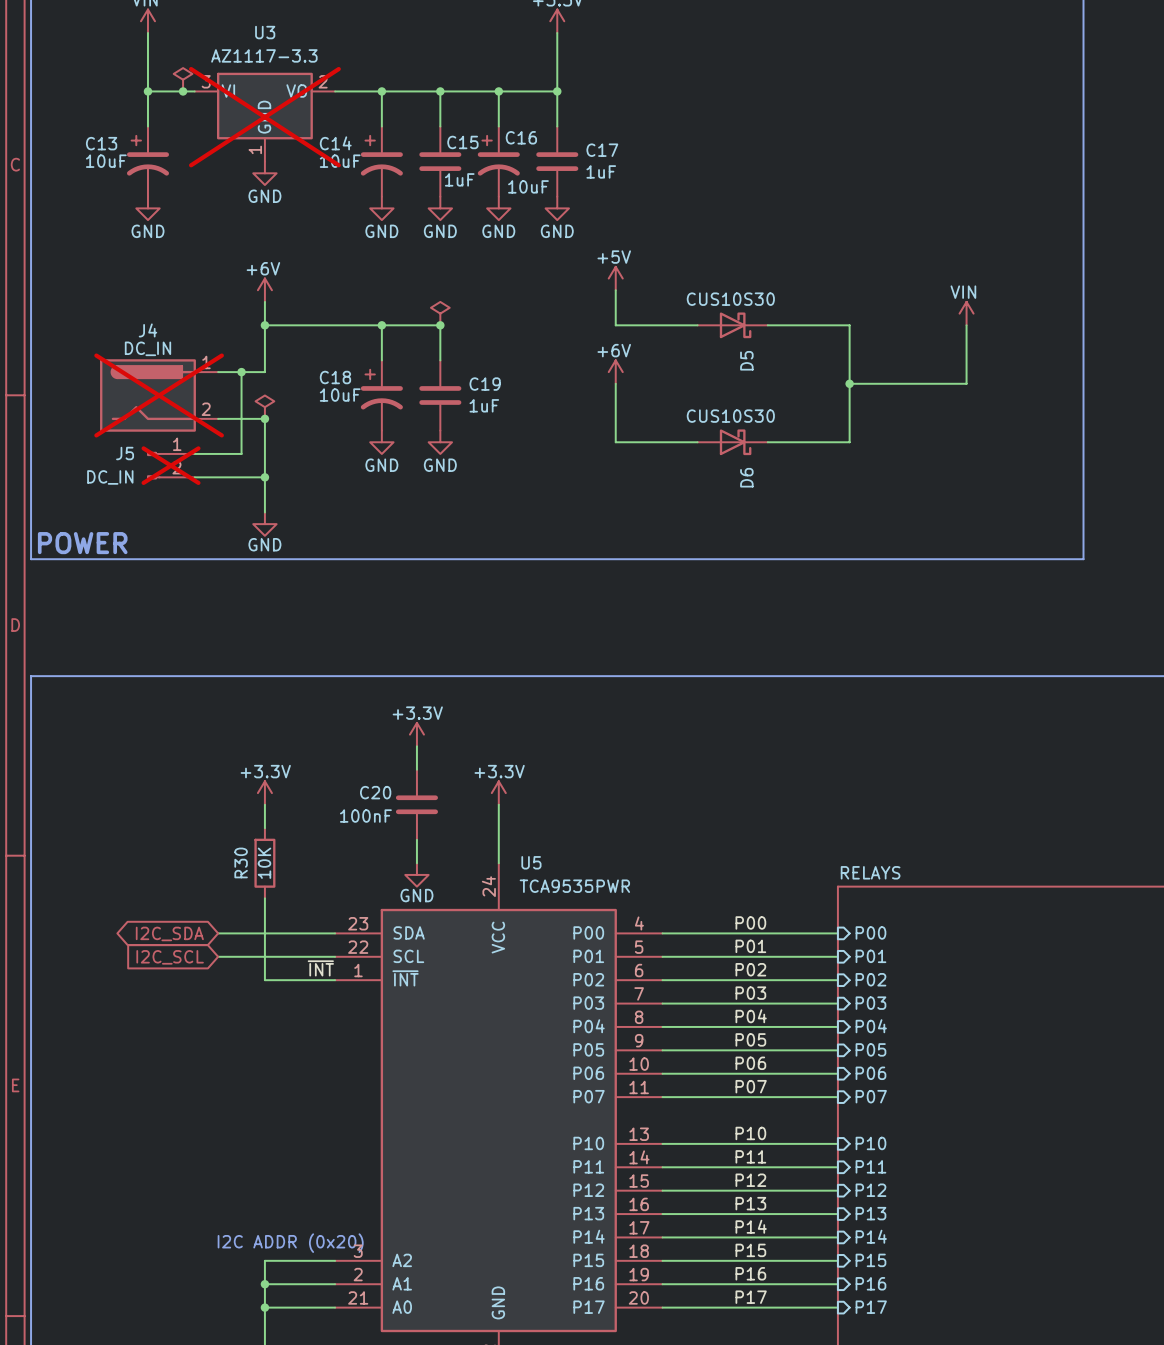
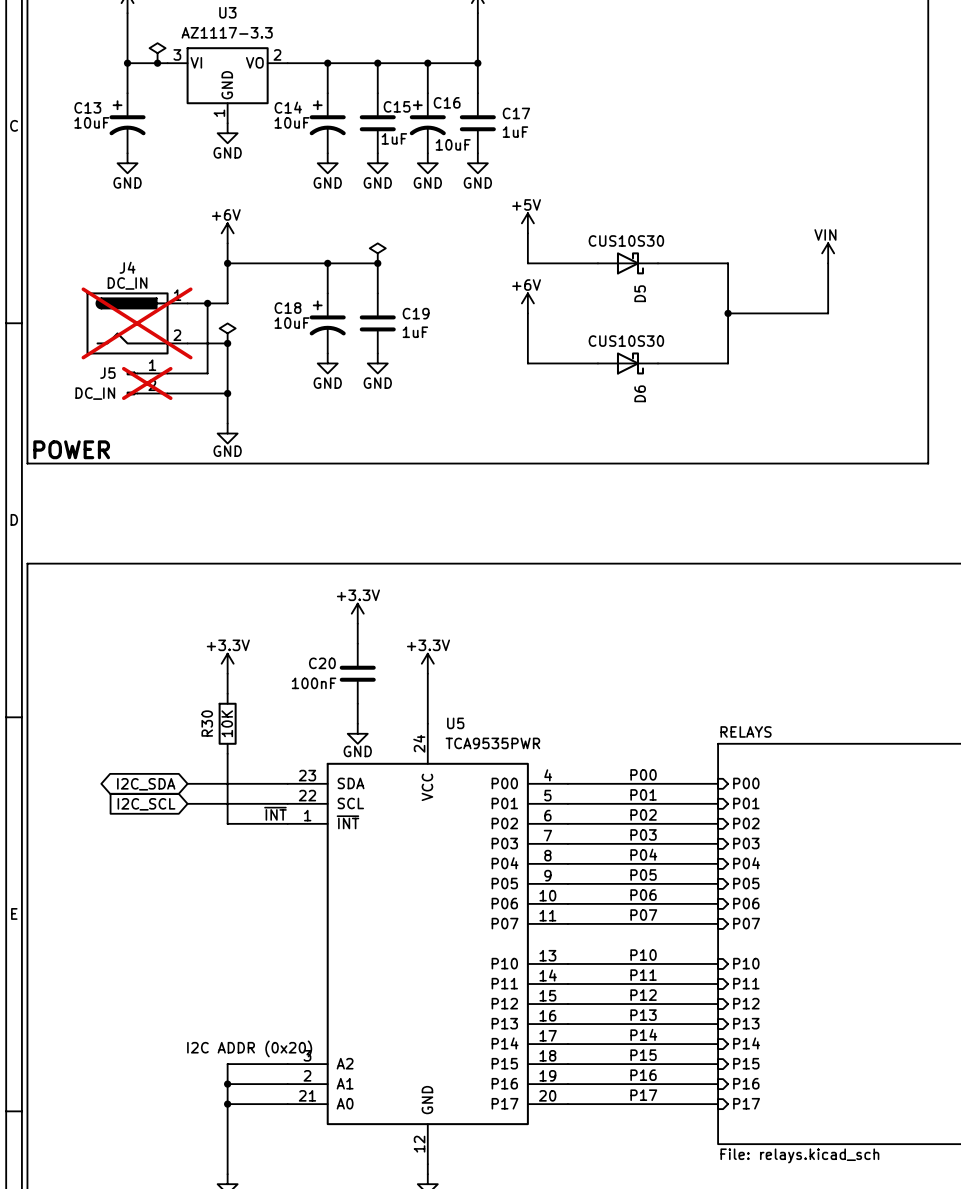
U3 do-not-place cross: (264, 117) -> none

